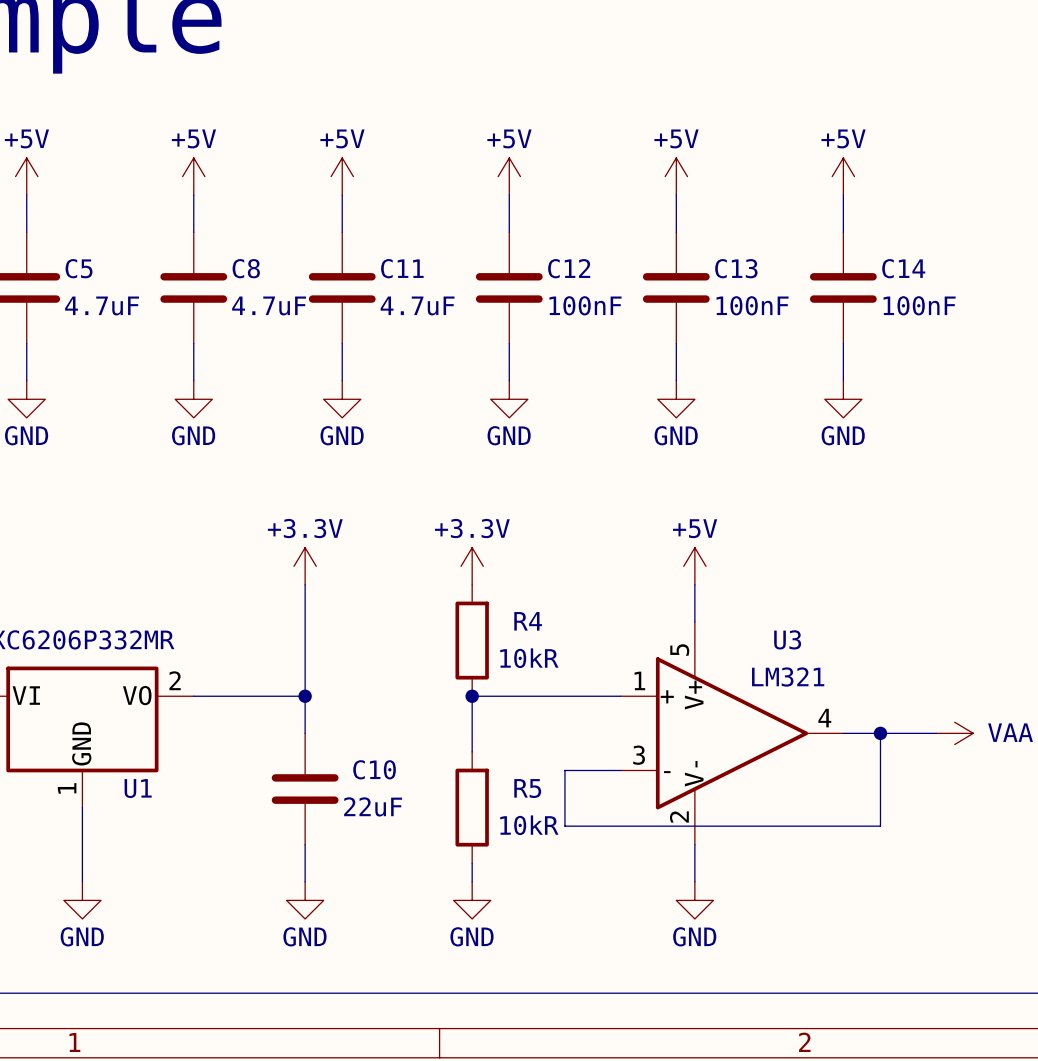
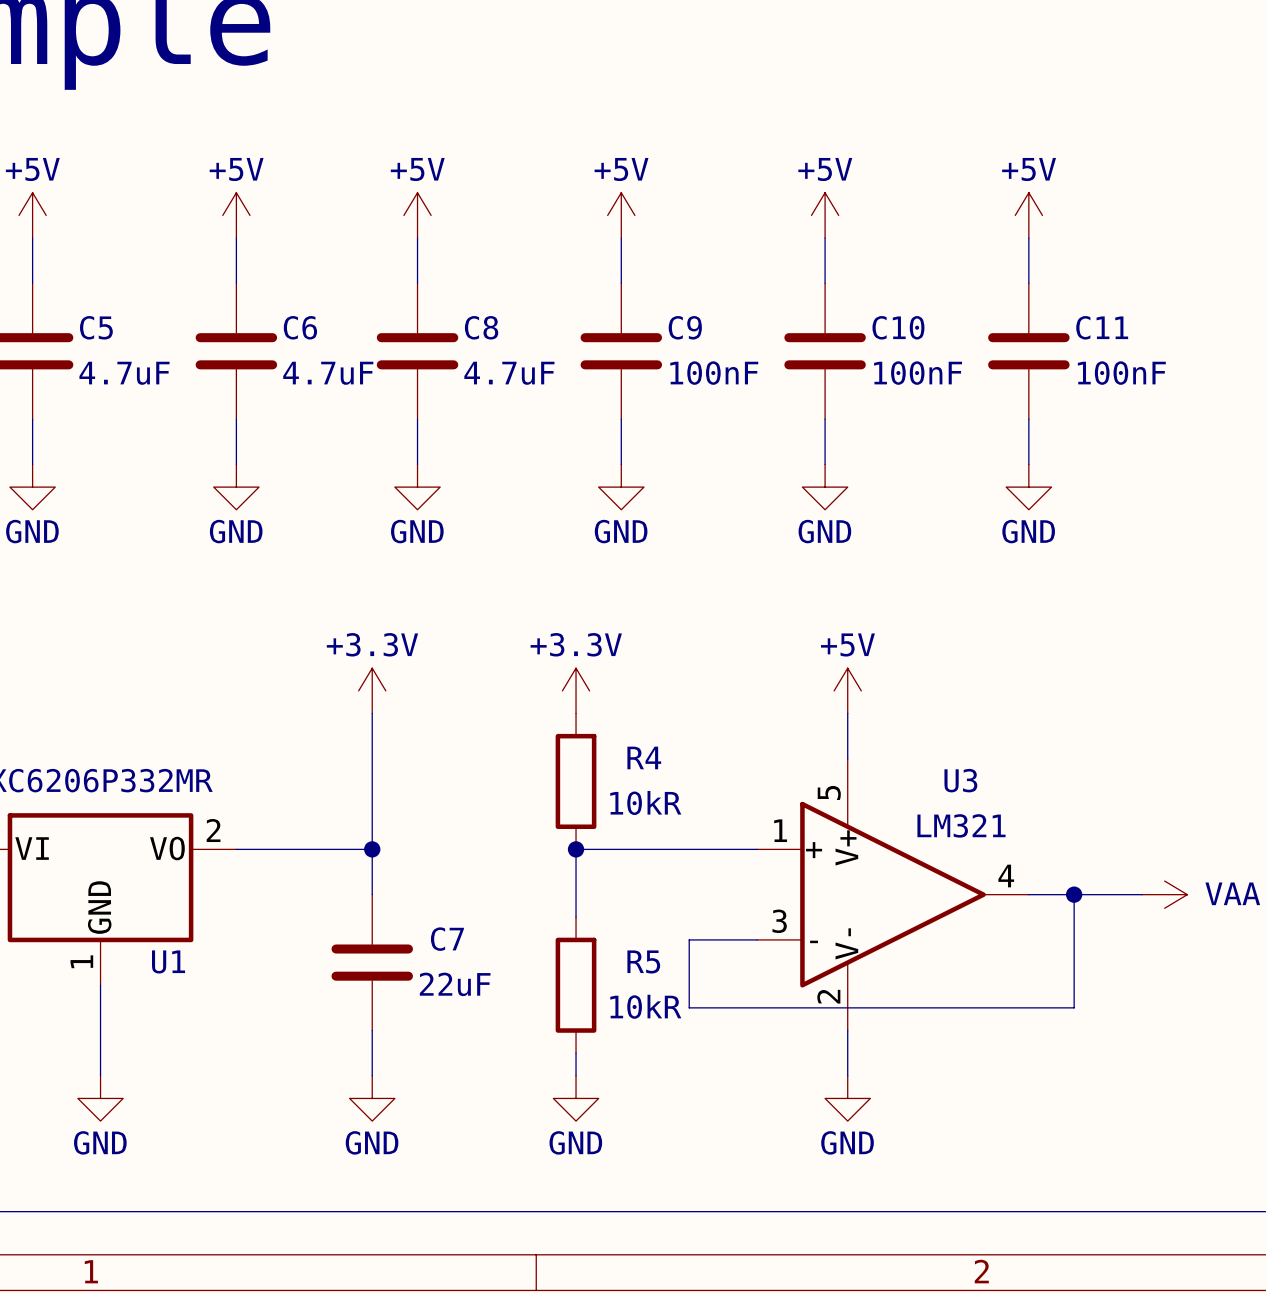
C8 name: C8 (246, 268) -> C6 (300, 327)
C11 name: C11 (402, 268) -> C8 (481, 327)
C12 name: C12 (569, 268) -> C9 (685, 327)
C13 name: C13 (736, 268) -> C10 (898, 327)
C14 name: C14 (903, 268) -> C11 (1102, 327)
C10 name: C10 (374, 769) -> C7 (447, 939)

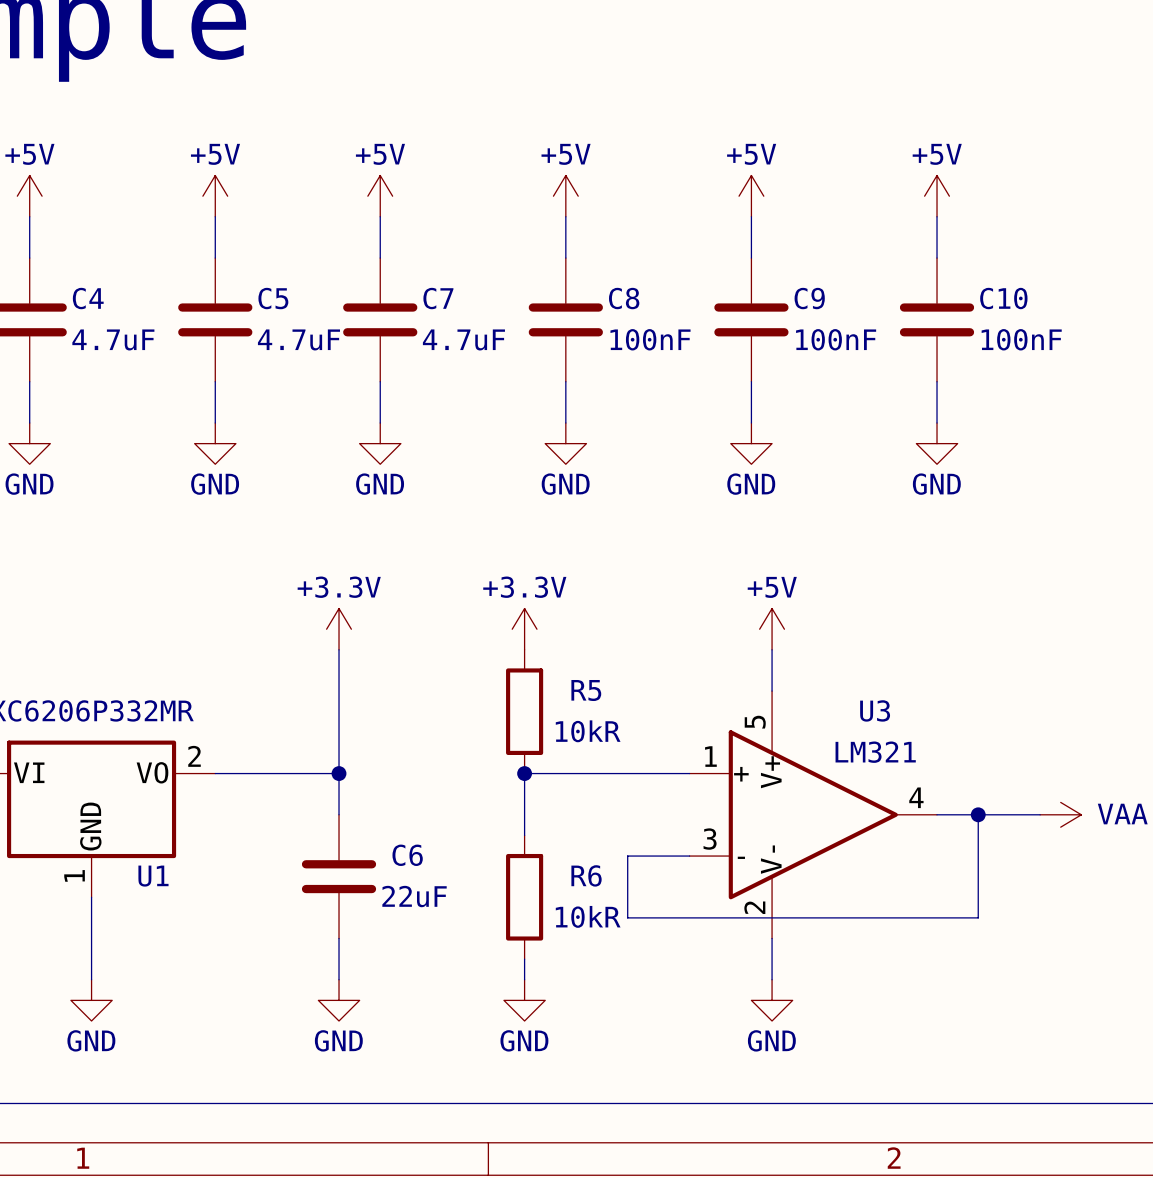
C5 name: C5 (96, 327) -> C4 (88, 298)
C6 name: C6 (300, 327) -> C5 (273, 298)
C8 name: C8 (481, 327) -> C7 (438, 298)
C9 name: C9 (685, 327) -> C8 (624, 298)
C10 name: C10 (898, 327) -> C9 (809, 298)
C11 name: C11 (1102, 327) -> C10 (1003, 298)
R4 name: R4 (644, 757) -> R5 (586, 690)
C7 name: C7 (447, 939) -> C6 (407, 855)
R5 name: R5 (643, 961) -> R6 (586, 875)

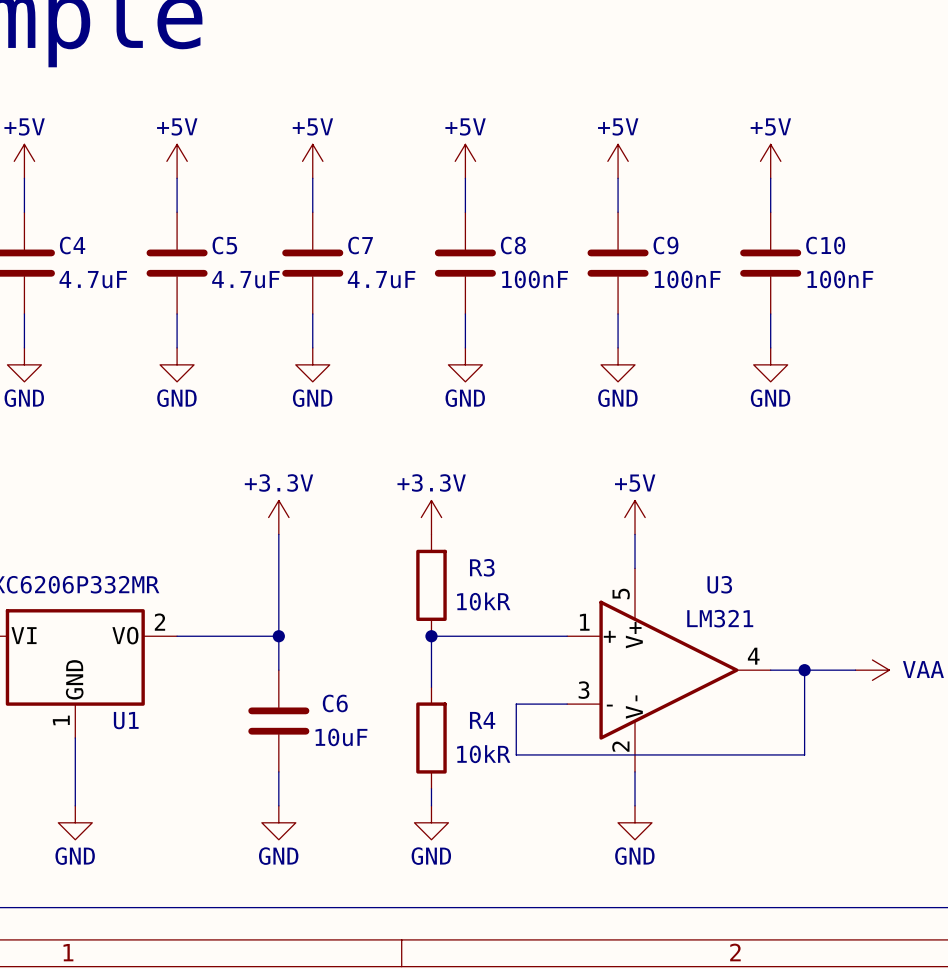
R5 name: R5 (586, 690) -> R3 (482, 567)
R6 name: R6 (586, 875) -> R4 (482, 720)
C6 value: 22uF (414, 896) -> 10uF (341, 737)

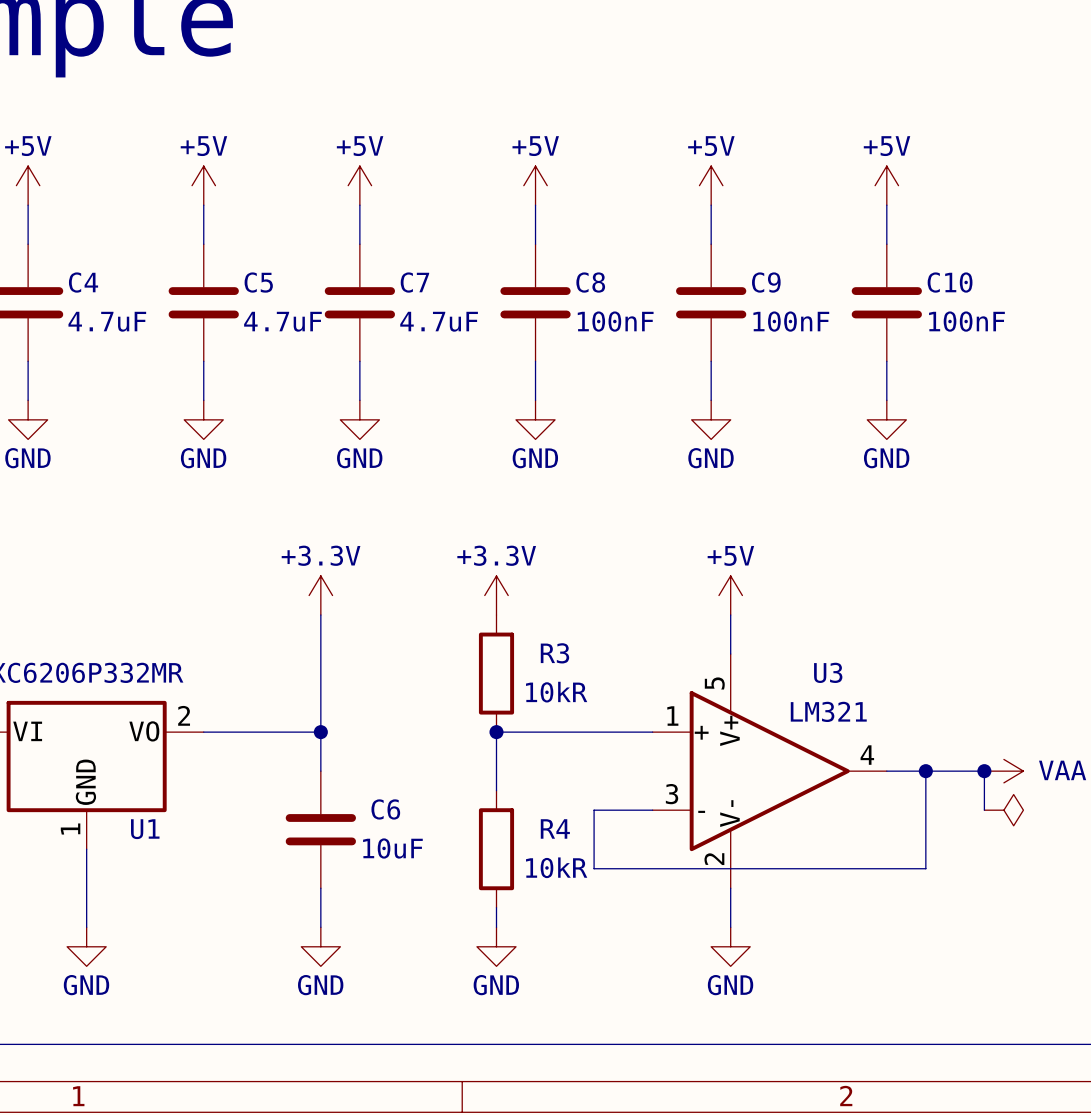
wire: none -> (984, 771) (984, 810)
junction: none -> (984, 771)
power symbol: none -> (1003, 810)

